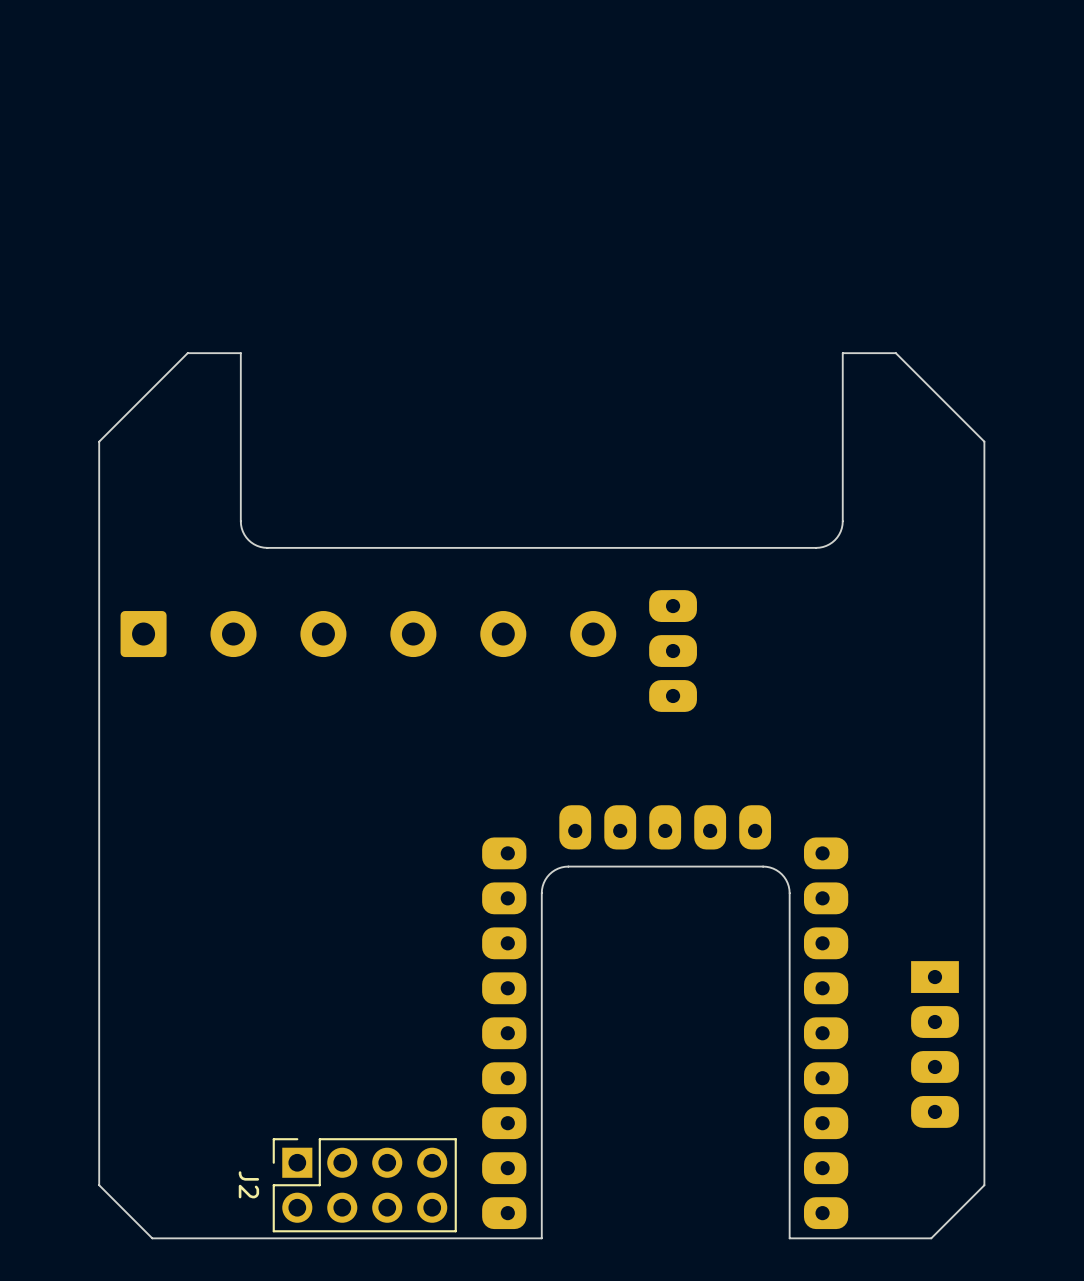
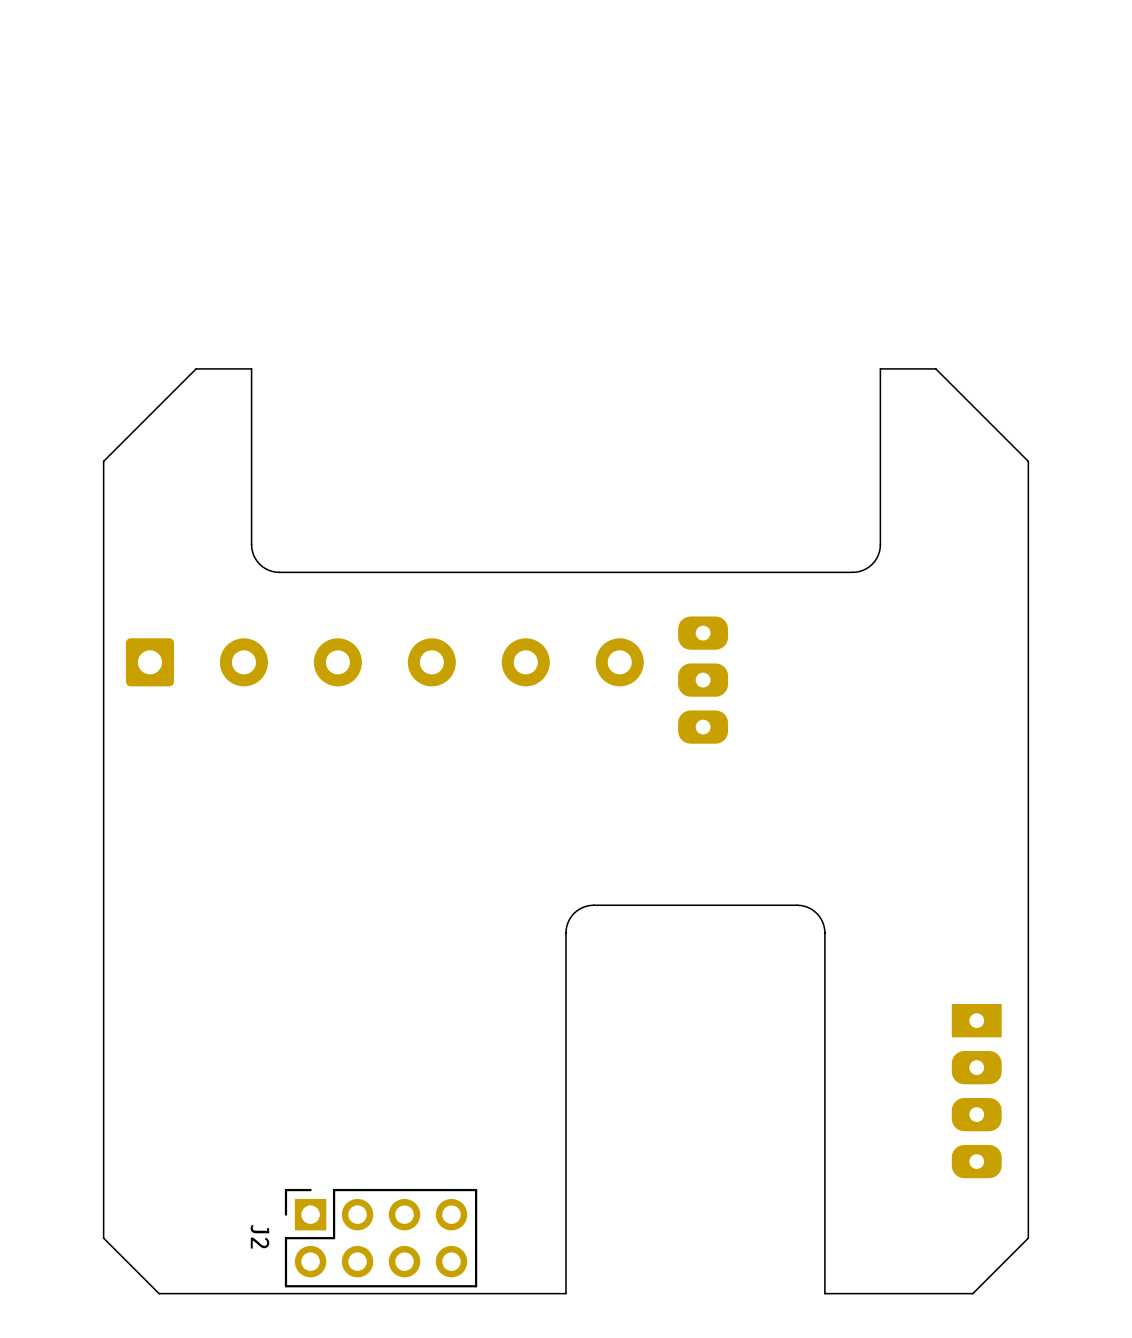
part: (665, 1017) -> none

